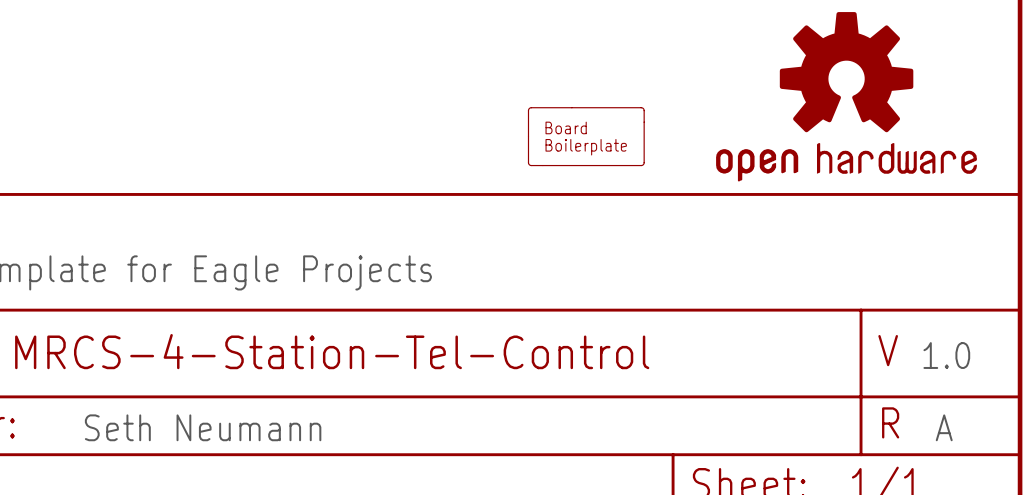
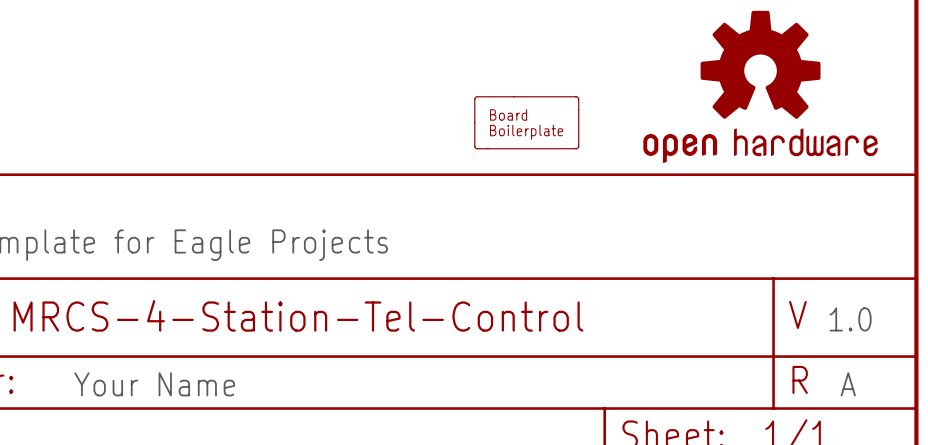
text: Seth Neumann (203, 427) -> Your Name (154, 384)

